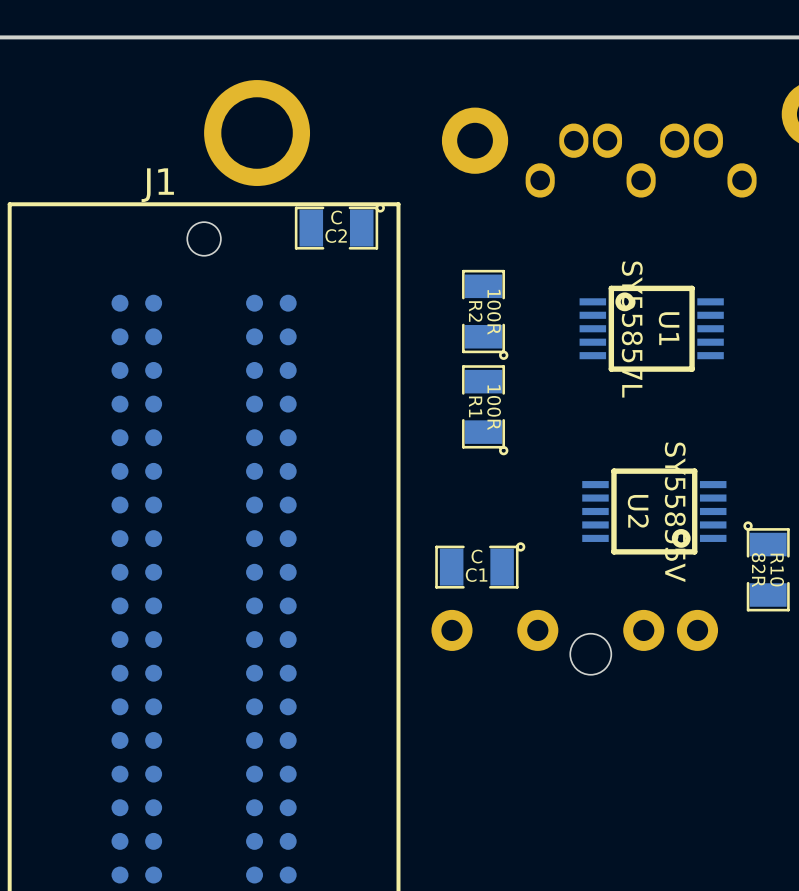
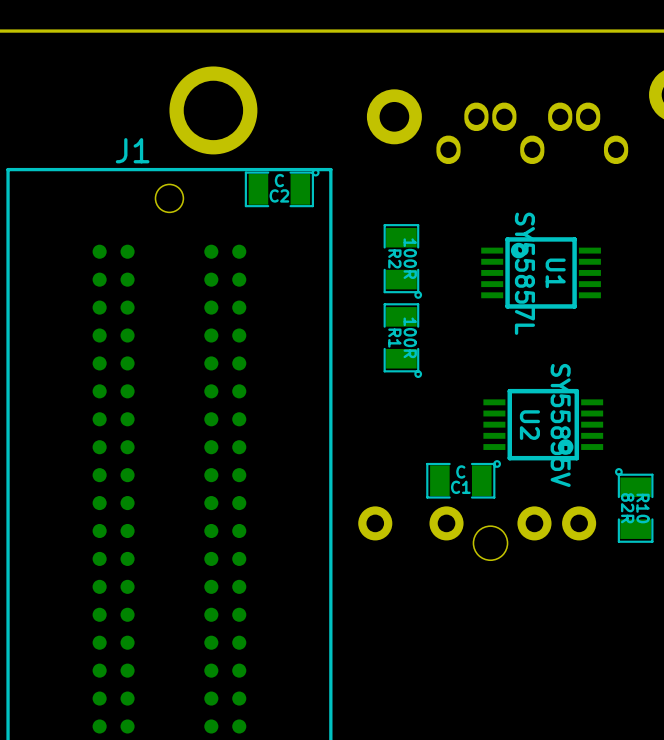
C1 position: (480, 565) -> (463, 479)
R10 position: (766, 566) -> (634, 505)

